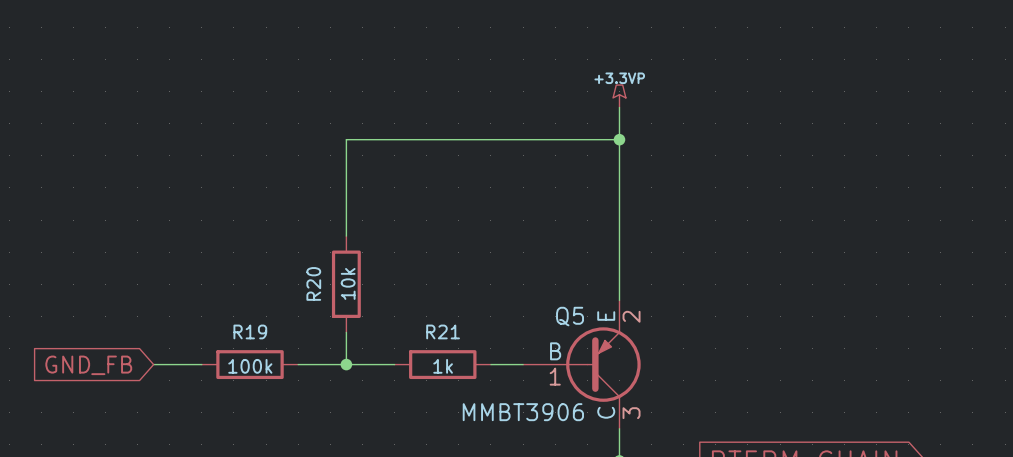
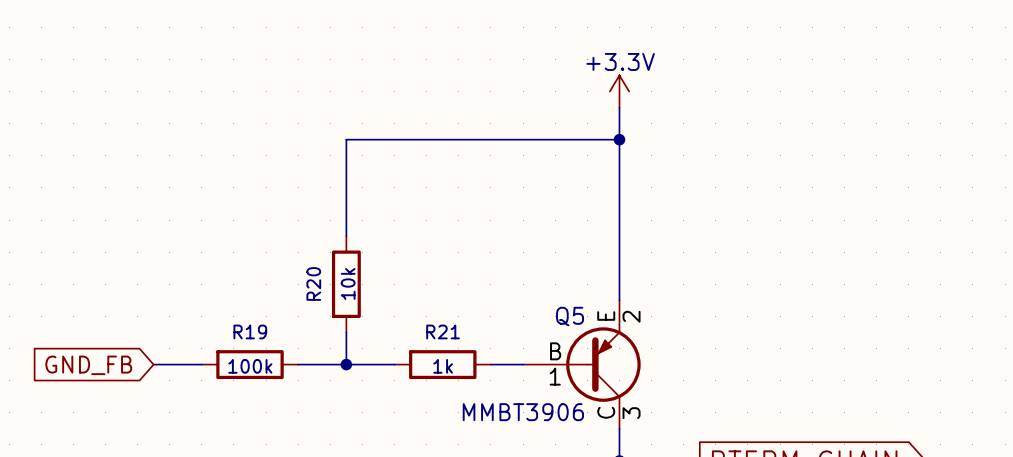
power symbol: +3.3VP (619, 96) -> +3.3V (619, 91)

